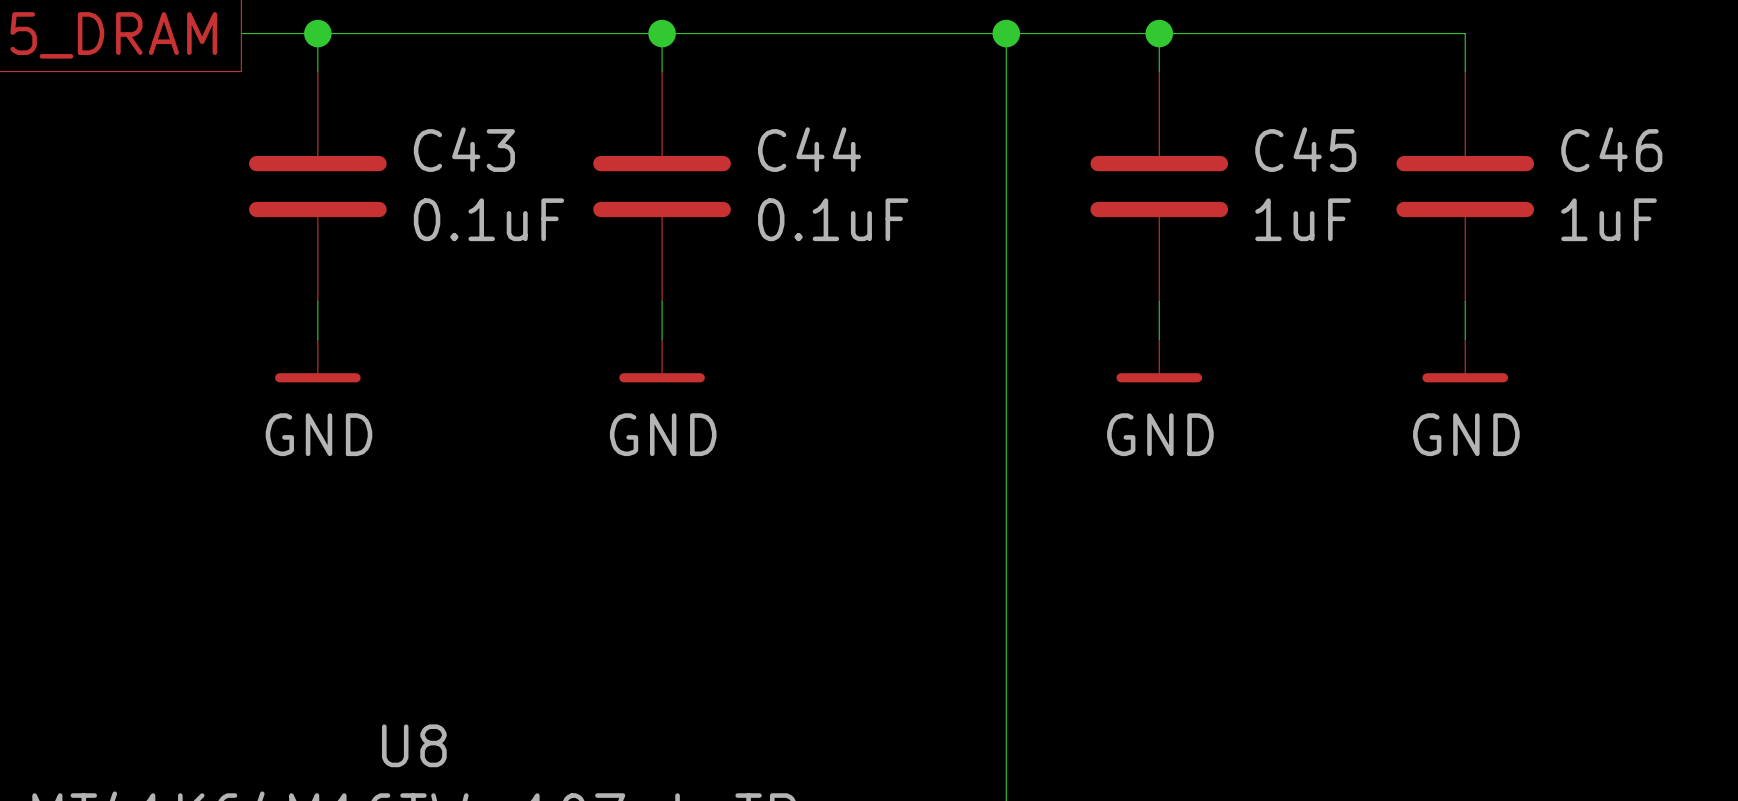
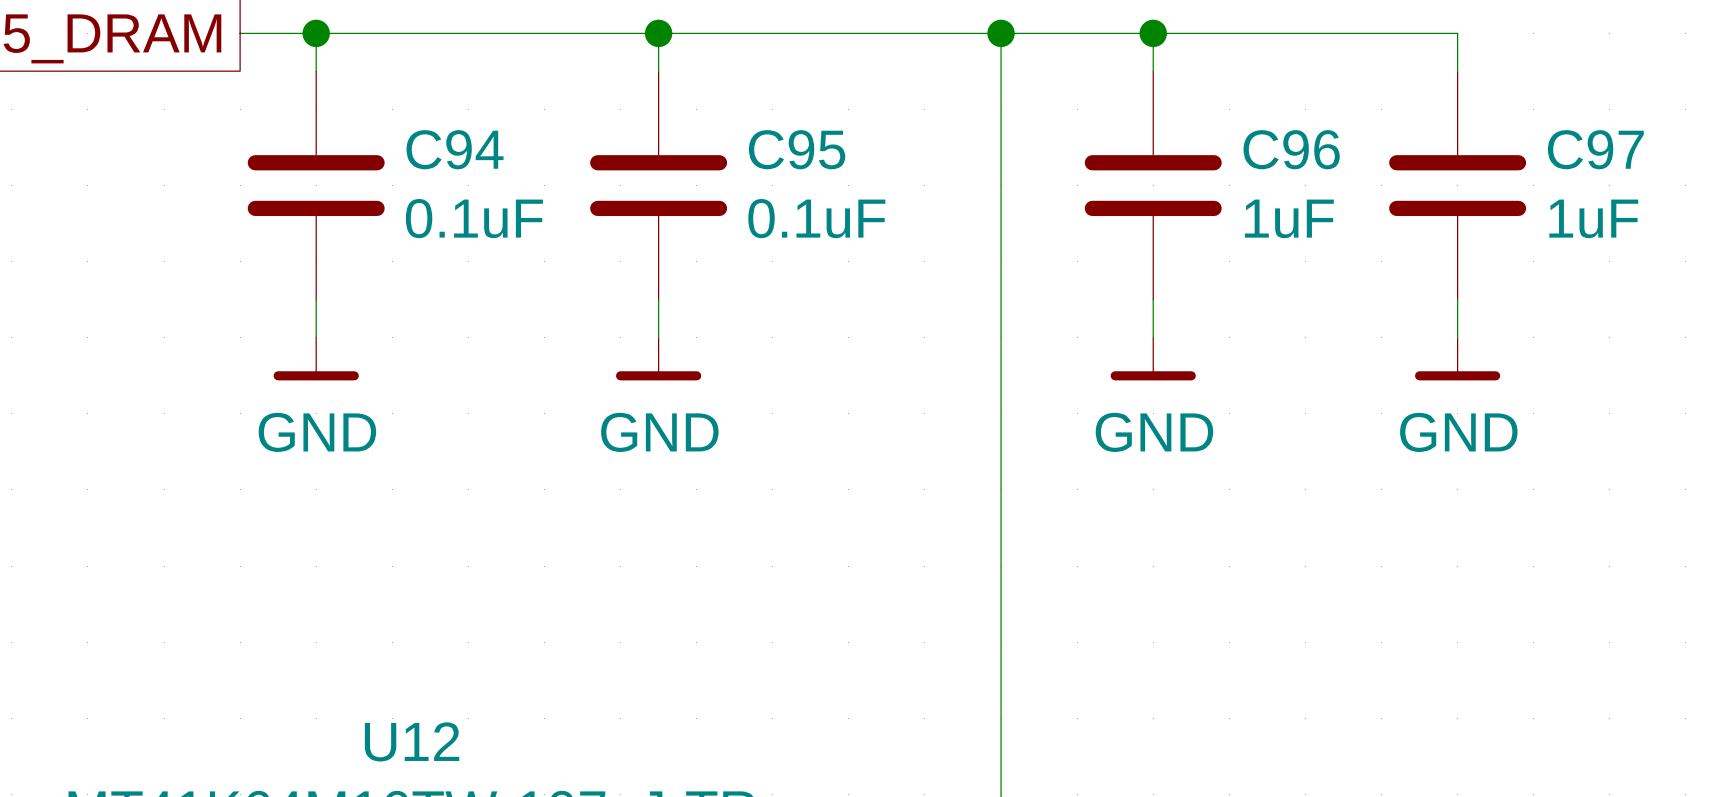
C43 name: C43 (464, 149) -> C94 (455, 149)
C44 name: C44 (809, 149) -> C95 (797, 149)
C45 name: C45 (1305, 149) -> C96 (1291, 149)
C46 name: C46 (1611, 149) -> C97 (1595, 149)
U8 name: U8 (414, 745) -> U12 (412, 741)

